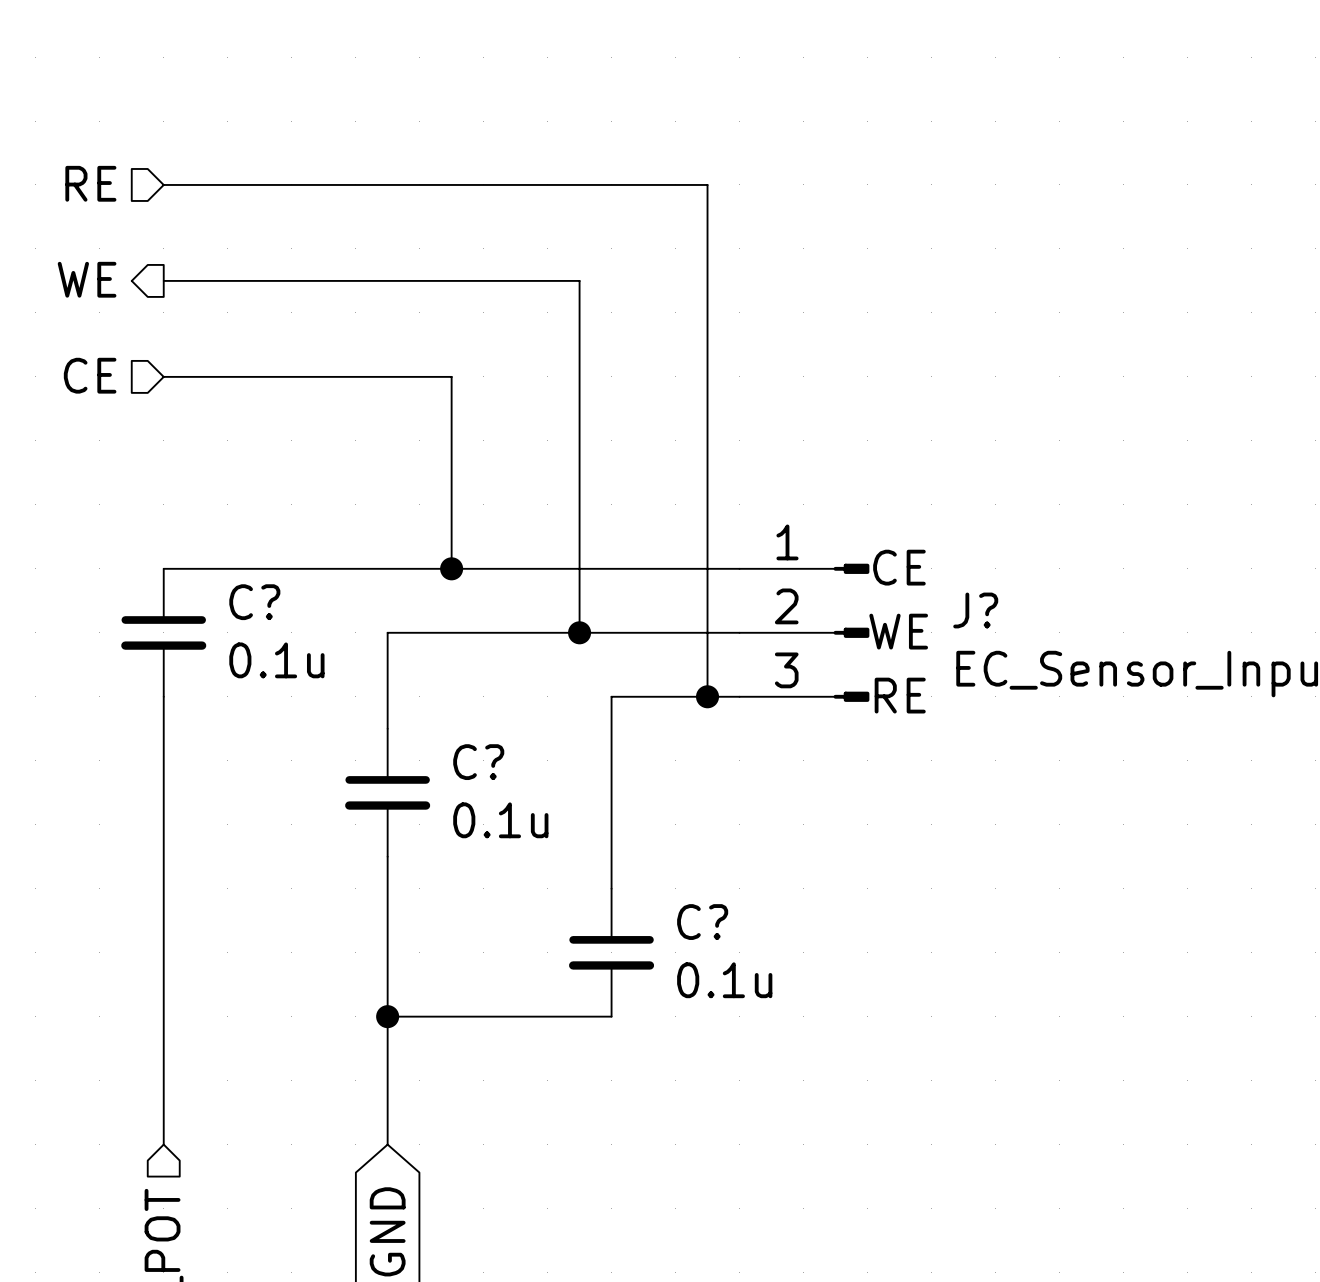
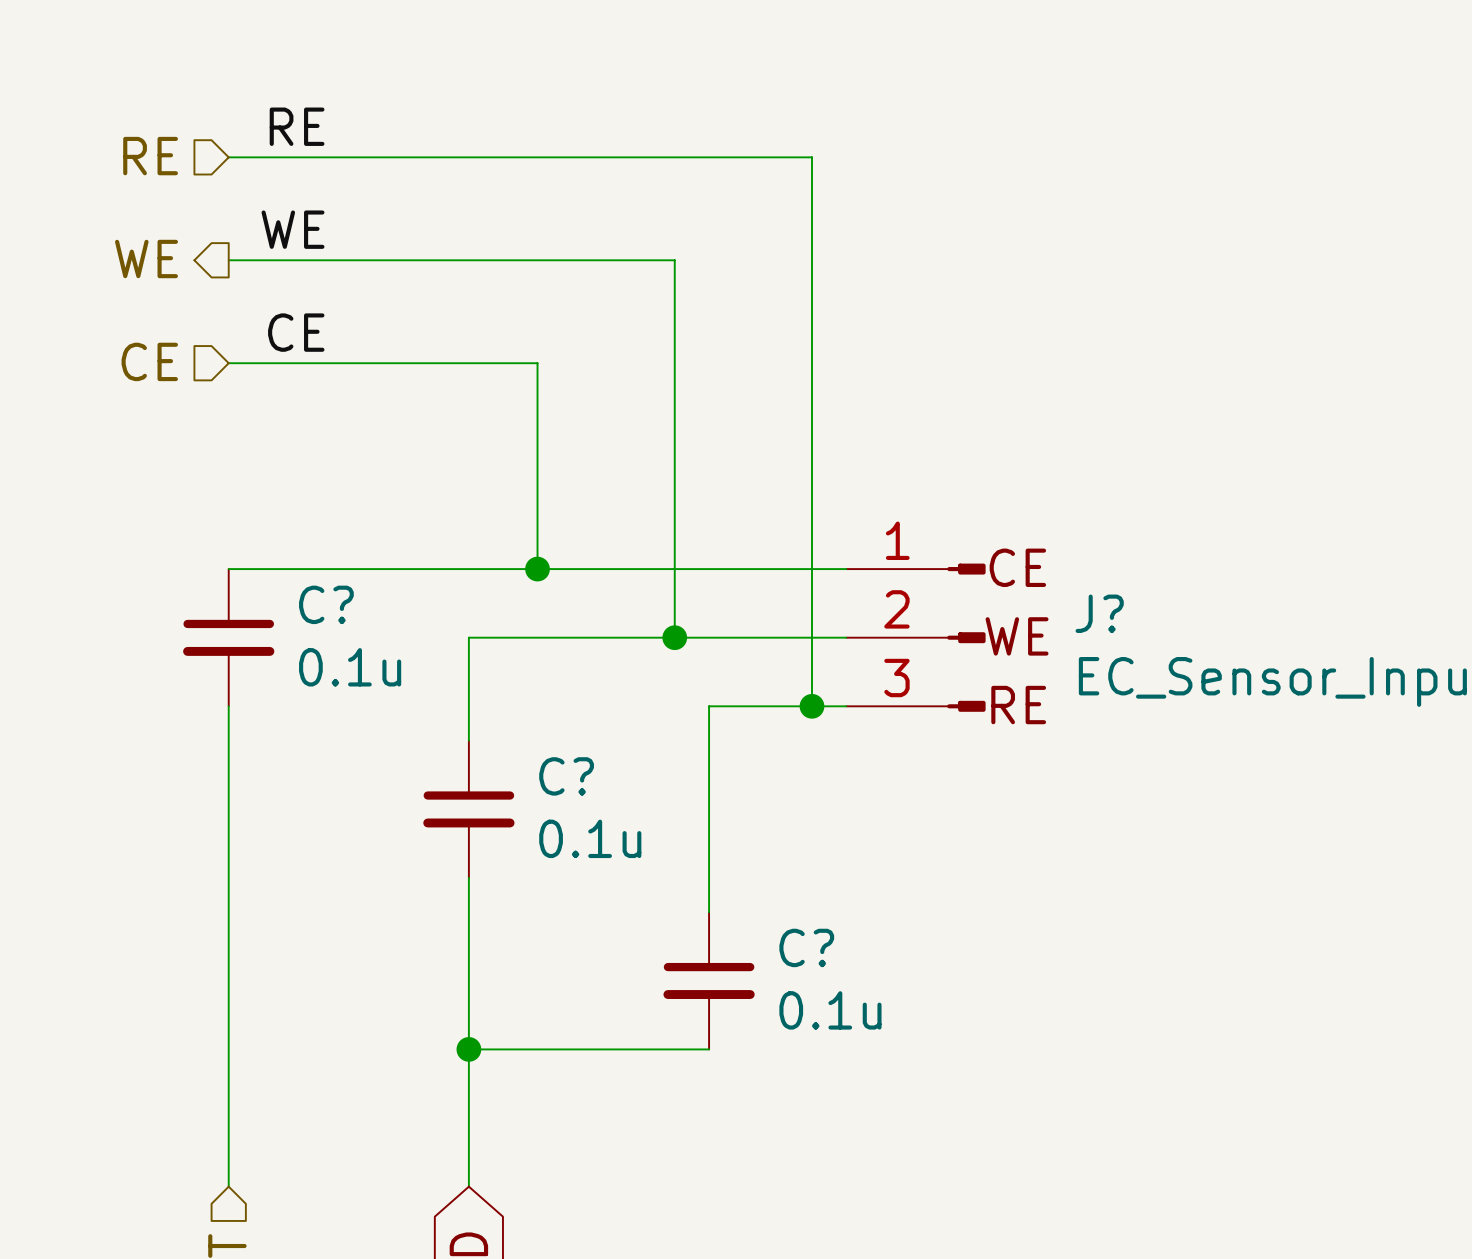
label: none -> RE (297, 126)
label: none -> WE (293, 229)
label: none -> CE (296, 332)

